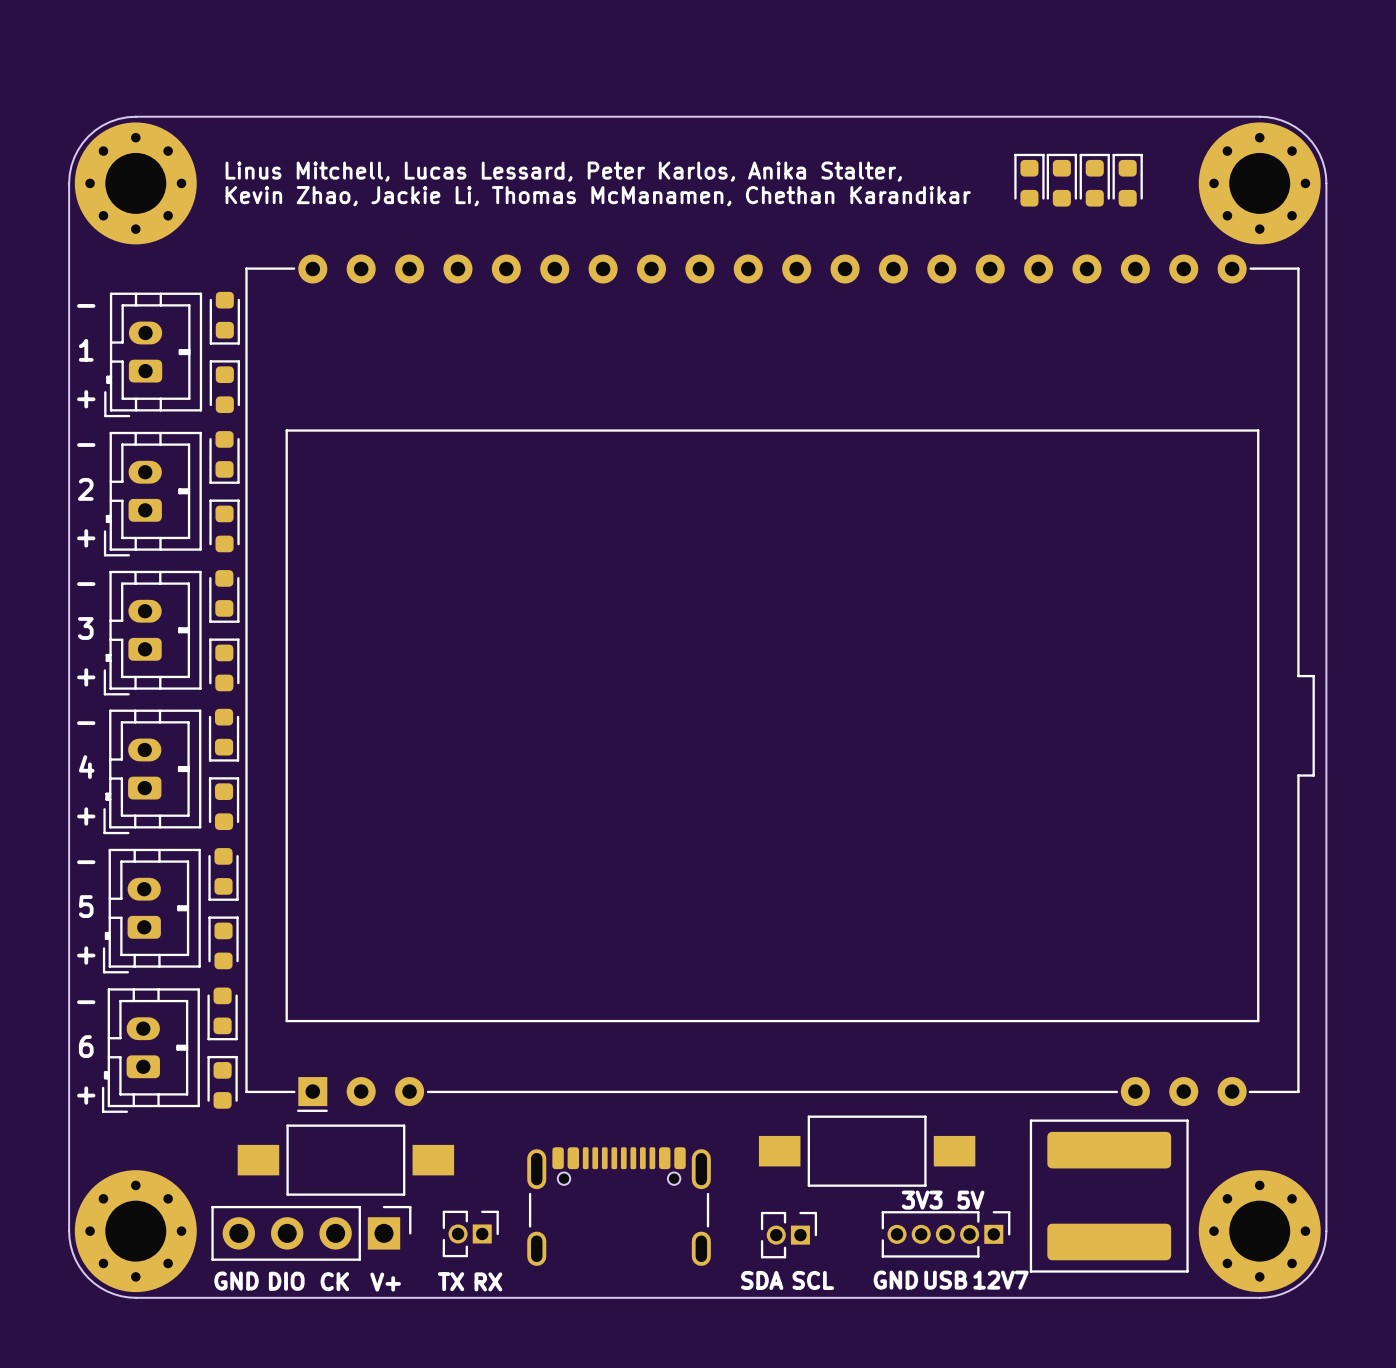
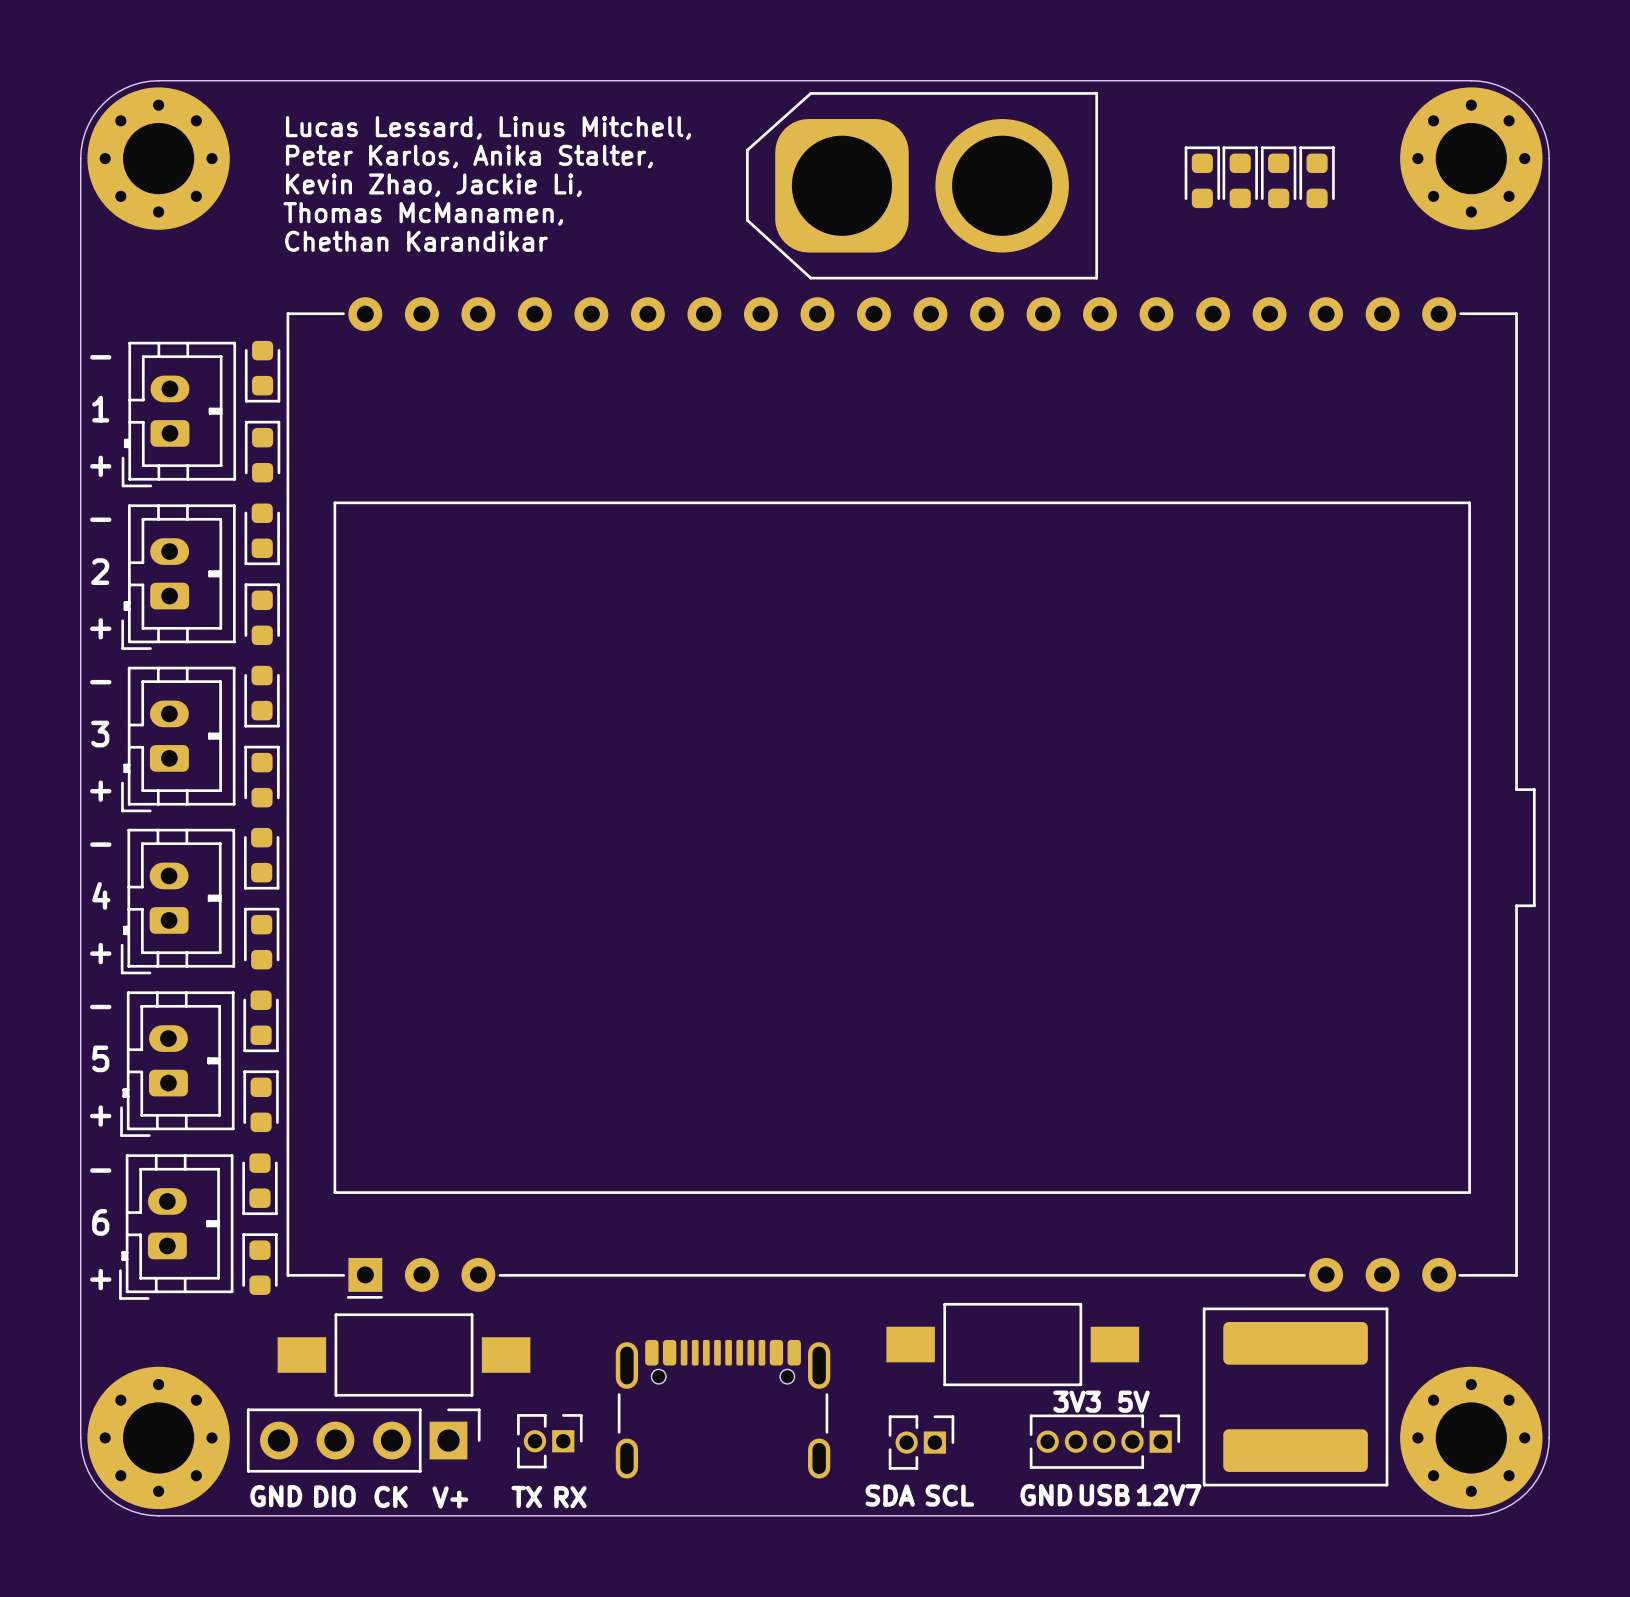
text: none -> Lucas Lessard, Linus Mitchell, (488, 127)
text: none -> Peter Karlos, Anika Stalter, (469, 156)
part: none -> (1202, 177)
part: none -> (1240, 177)
part: none -> (1278, 177)
part: none -> (1317, 177)
text: none -> Kevin Zhao, Jackie Li, (433, 185)
part: none -> (922, 185)
text: Linus Mitchell, Lucas Lessard, Peter Karlos, Anika Stalter, (563, 171) -> none
part: (1029, 180) -> none
part: (1061, 180) -> none
part: (1094, 180) -> none
part: (1127, 180) -> none
board edge: (69, 183) (74, 157) (88, 136) (110, 121) (135, 116) (1259, 116) (1281, 120) (1295, 126) (1306, 136) (1319, 154) (1324, 168) (1326, 183) -> (80, 214) (81, 149) (85, 132) (92, 117) (103, 103) (117, 92) (132, 85) (158, 80) (1480, 81) (1505, 88) (1519, 97) (1532, 110) (1541, 124) (1548, 149) (1549, 214)
part position: (135, 183) -> (158, 158)
text: none -> Thomas McManamen, (423, 213)
part position: (1259, 183) -> (1471, 158)
text: Kevin Zhao, Jackie Li, Thomas McManamen, Chethan Karandikar (598, 196) -> none
text: none -> Chethan Karandikar (416, 241)

